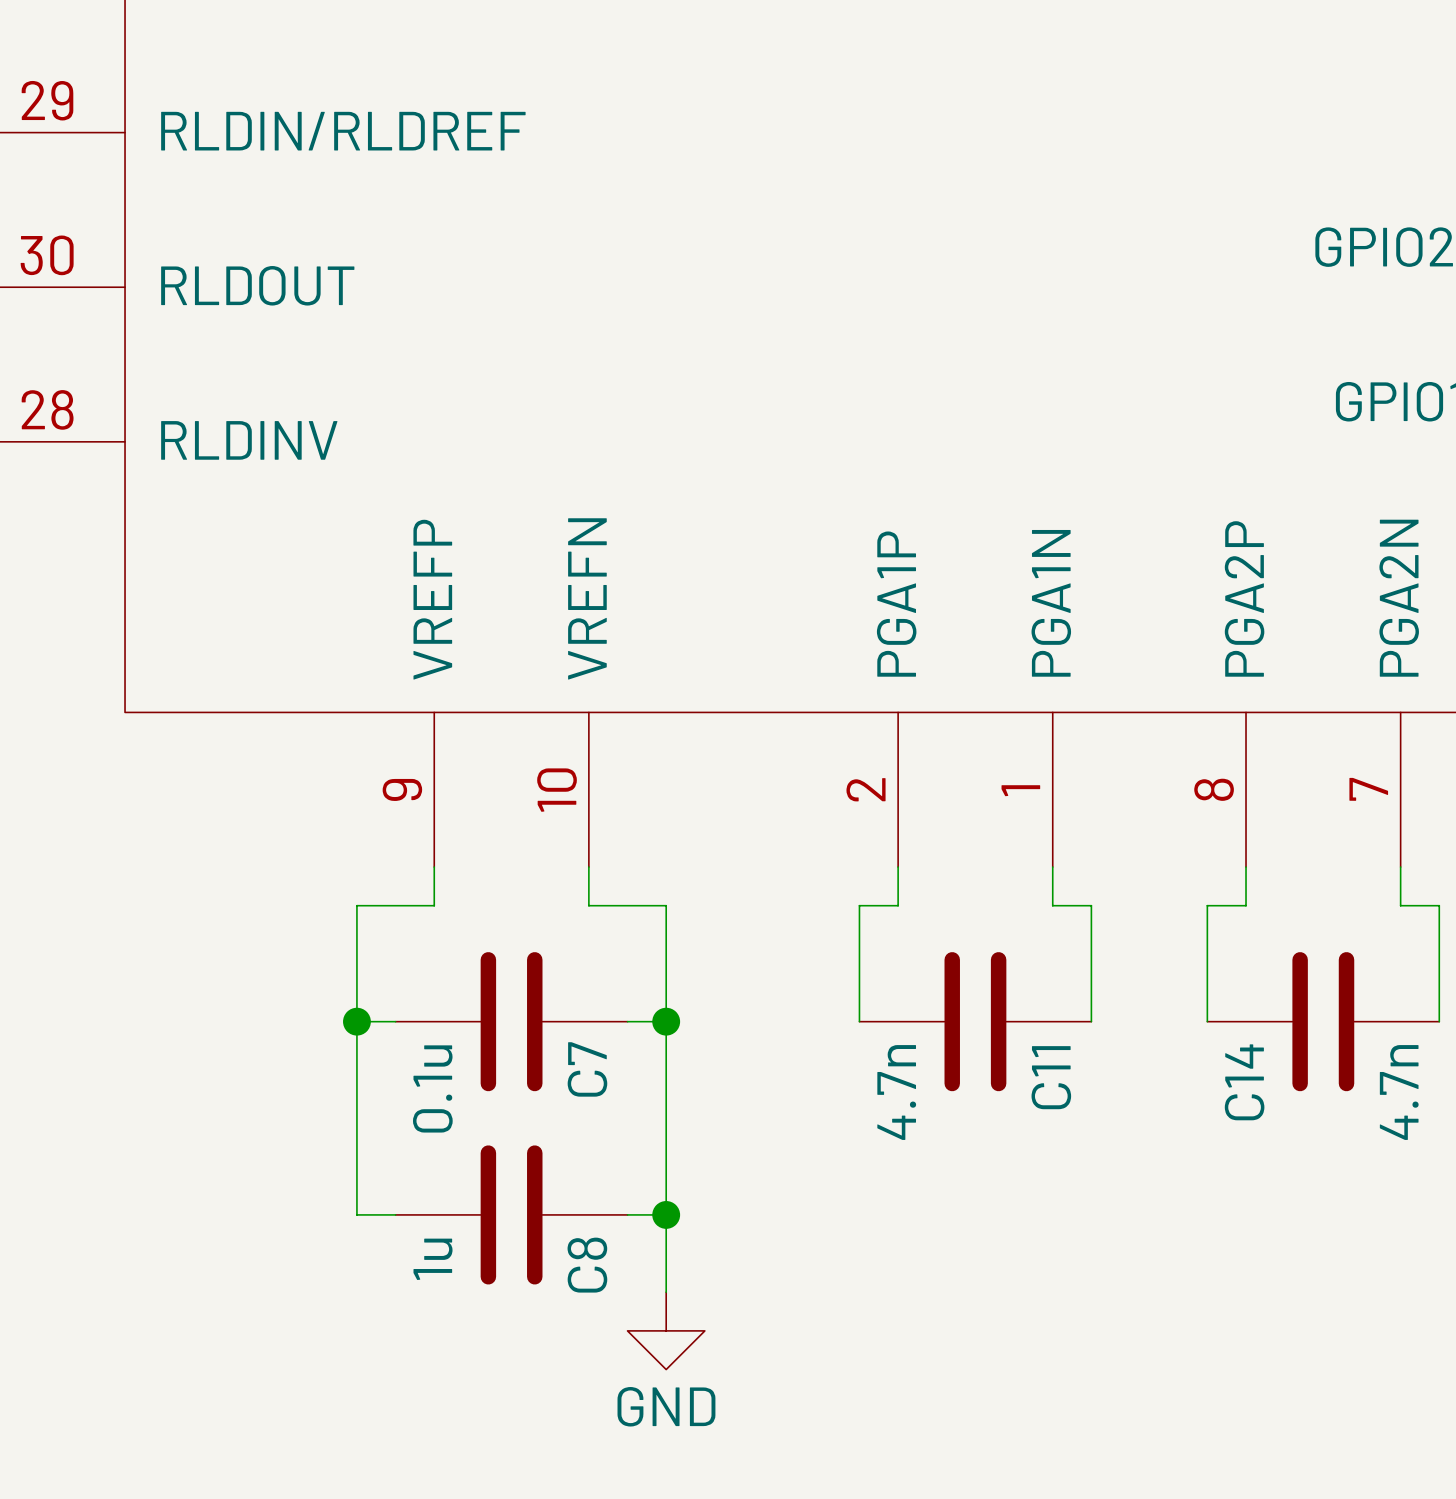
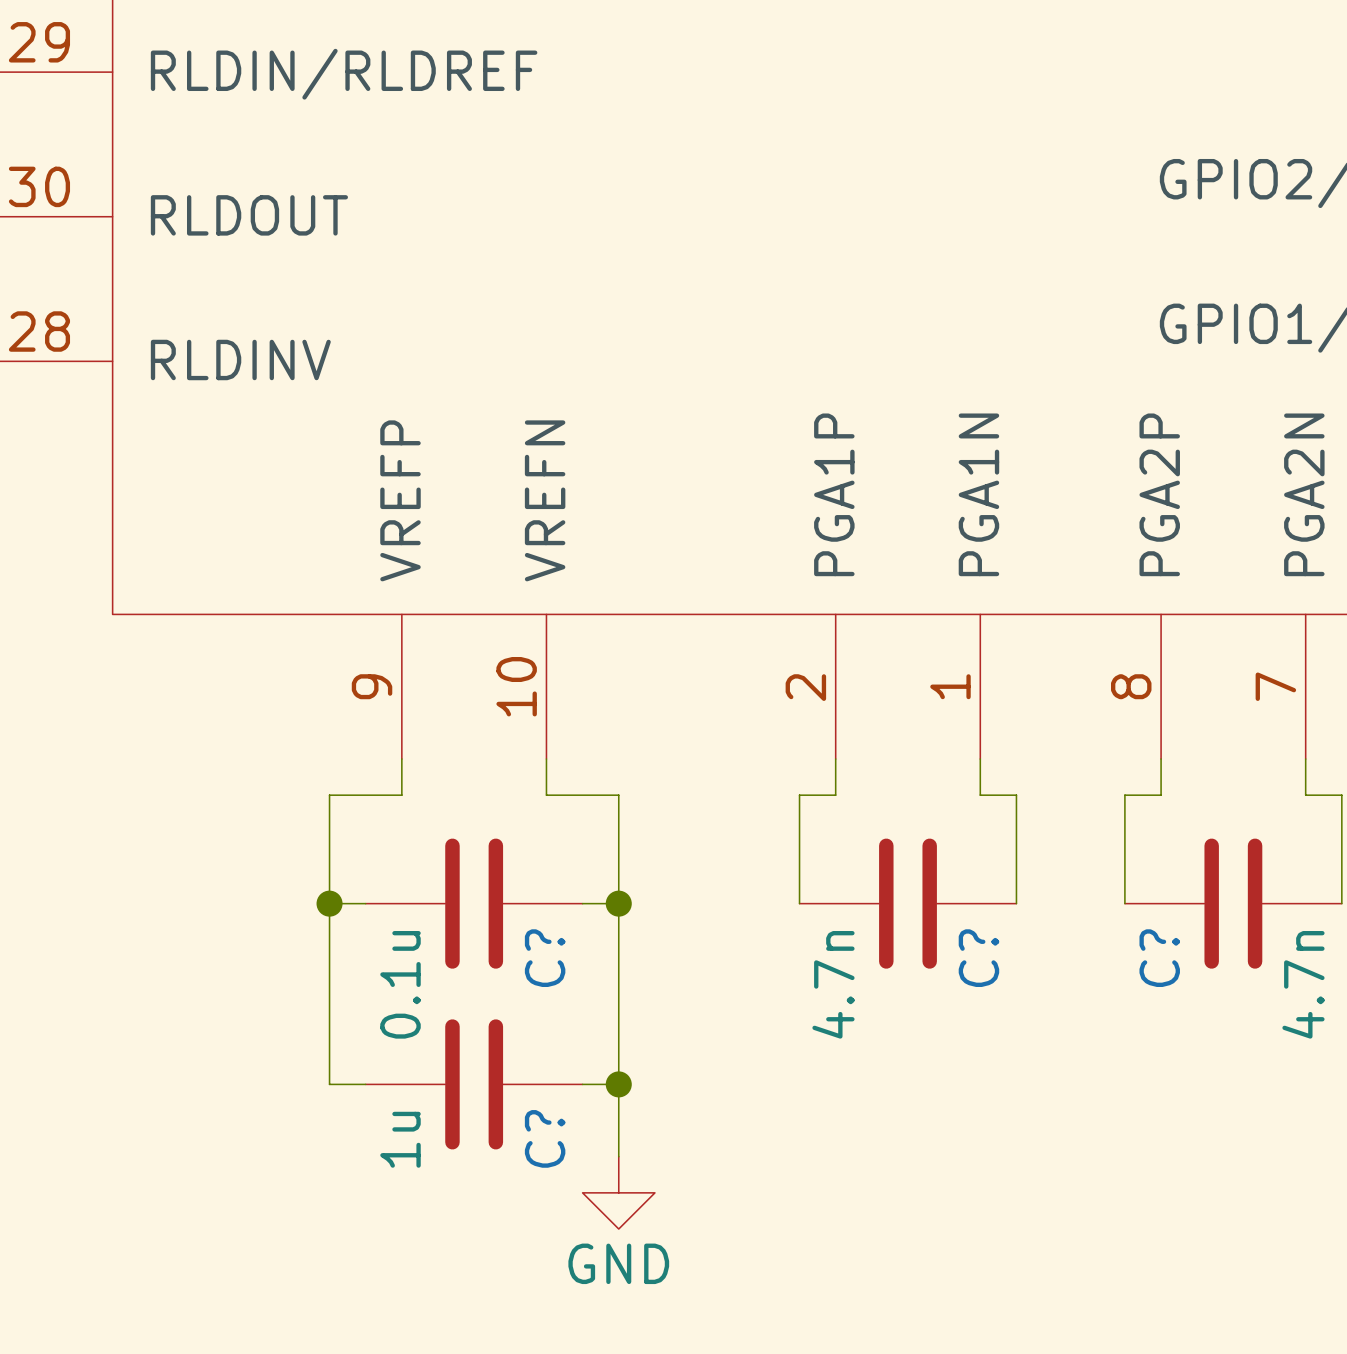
C7 name: C7 (587, 1069) -> C? (545, 958)
C11 name: C11 (1051, 1077) -> C? (978, 958)
C14 name: C14 (1244, 1082) -> C? (1159, 958)
C8 name: C8 (587, 1265) -> C? (545, 1138)

